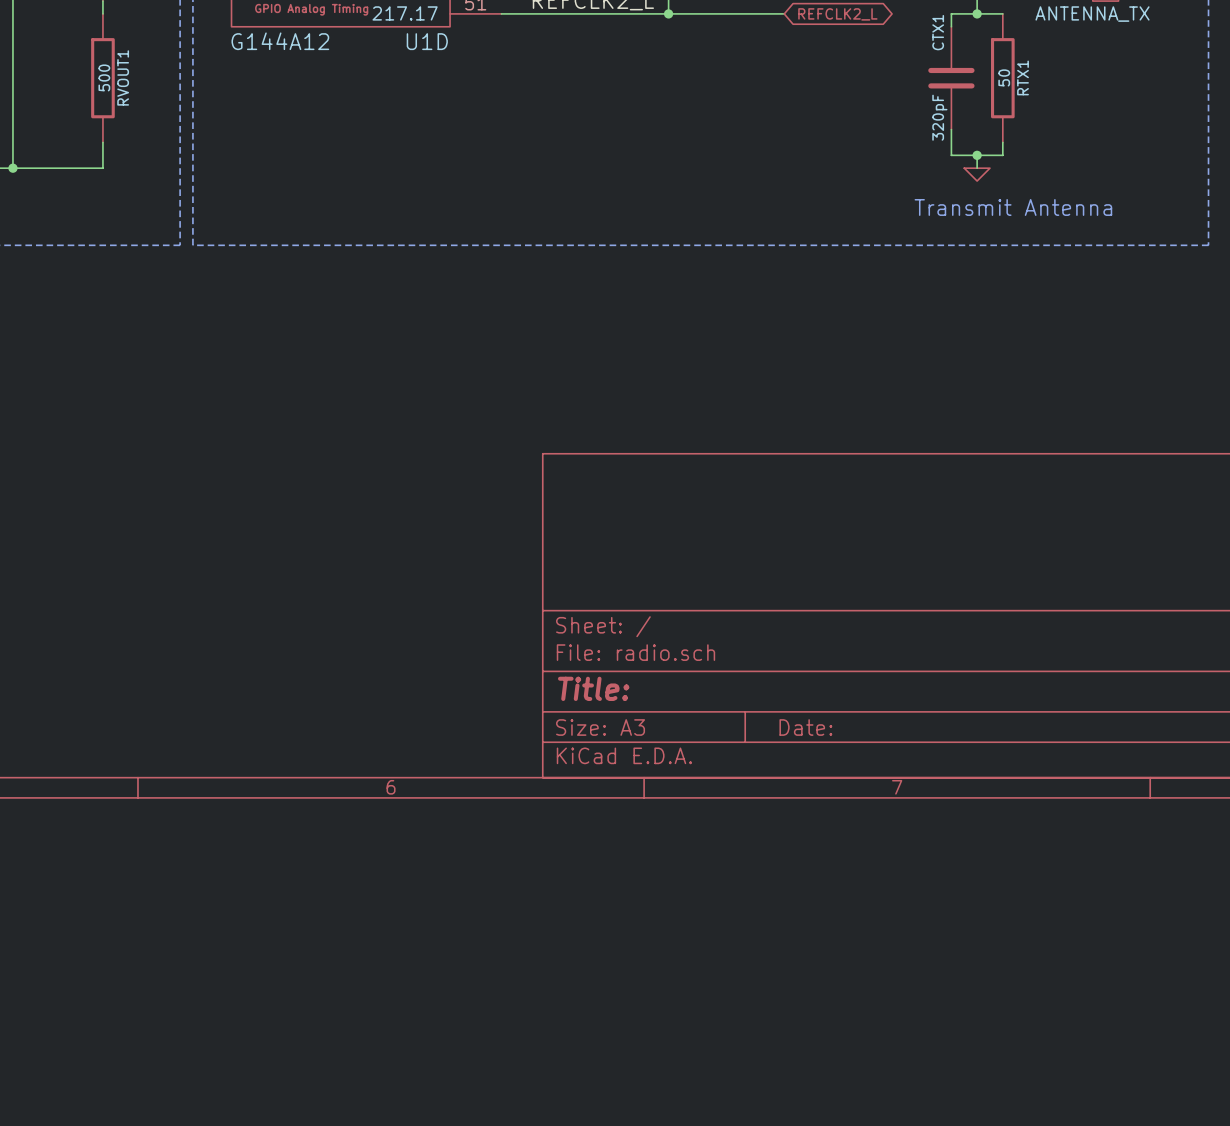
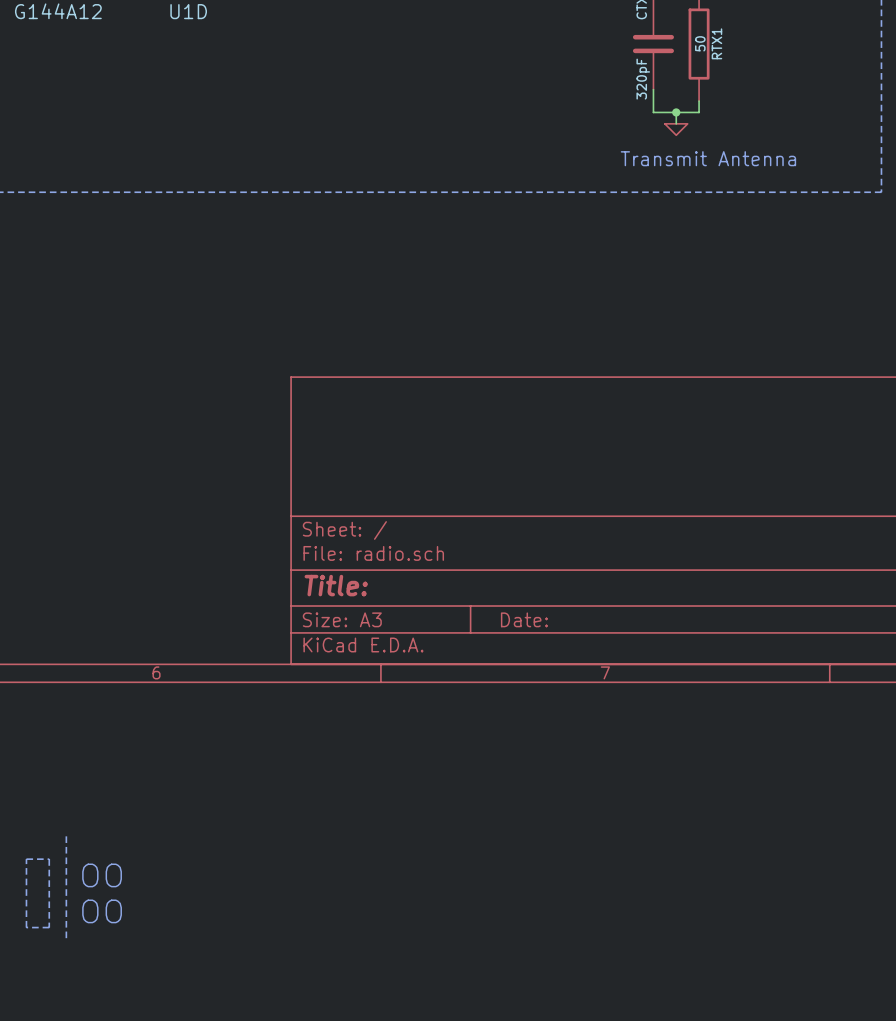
line: none -> (66, 836) (66, 938)
line: none -> (26, 859) (49, 859) (49, 927) (26, 927) (26, 859)
text: none -> OO (102, 875)
text: none -> OO (102, 911)

